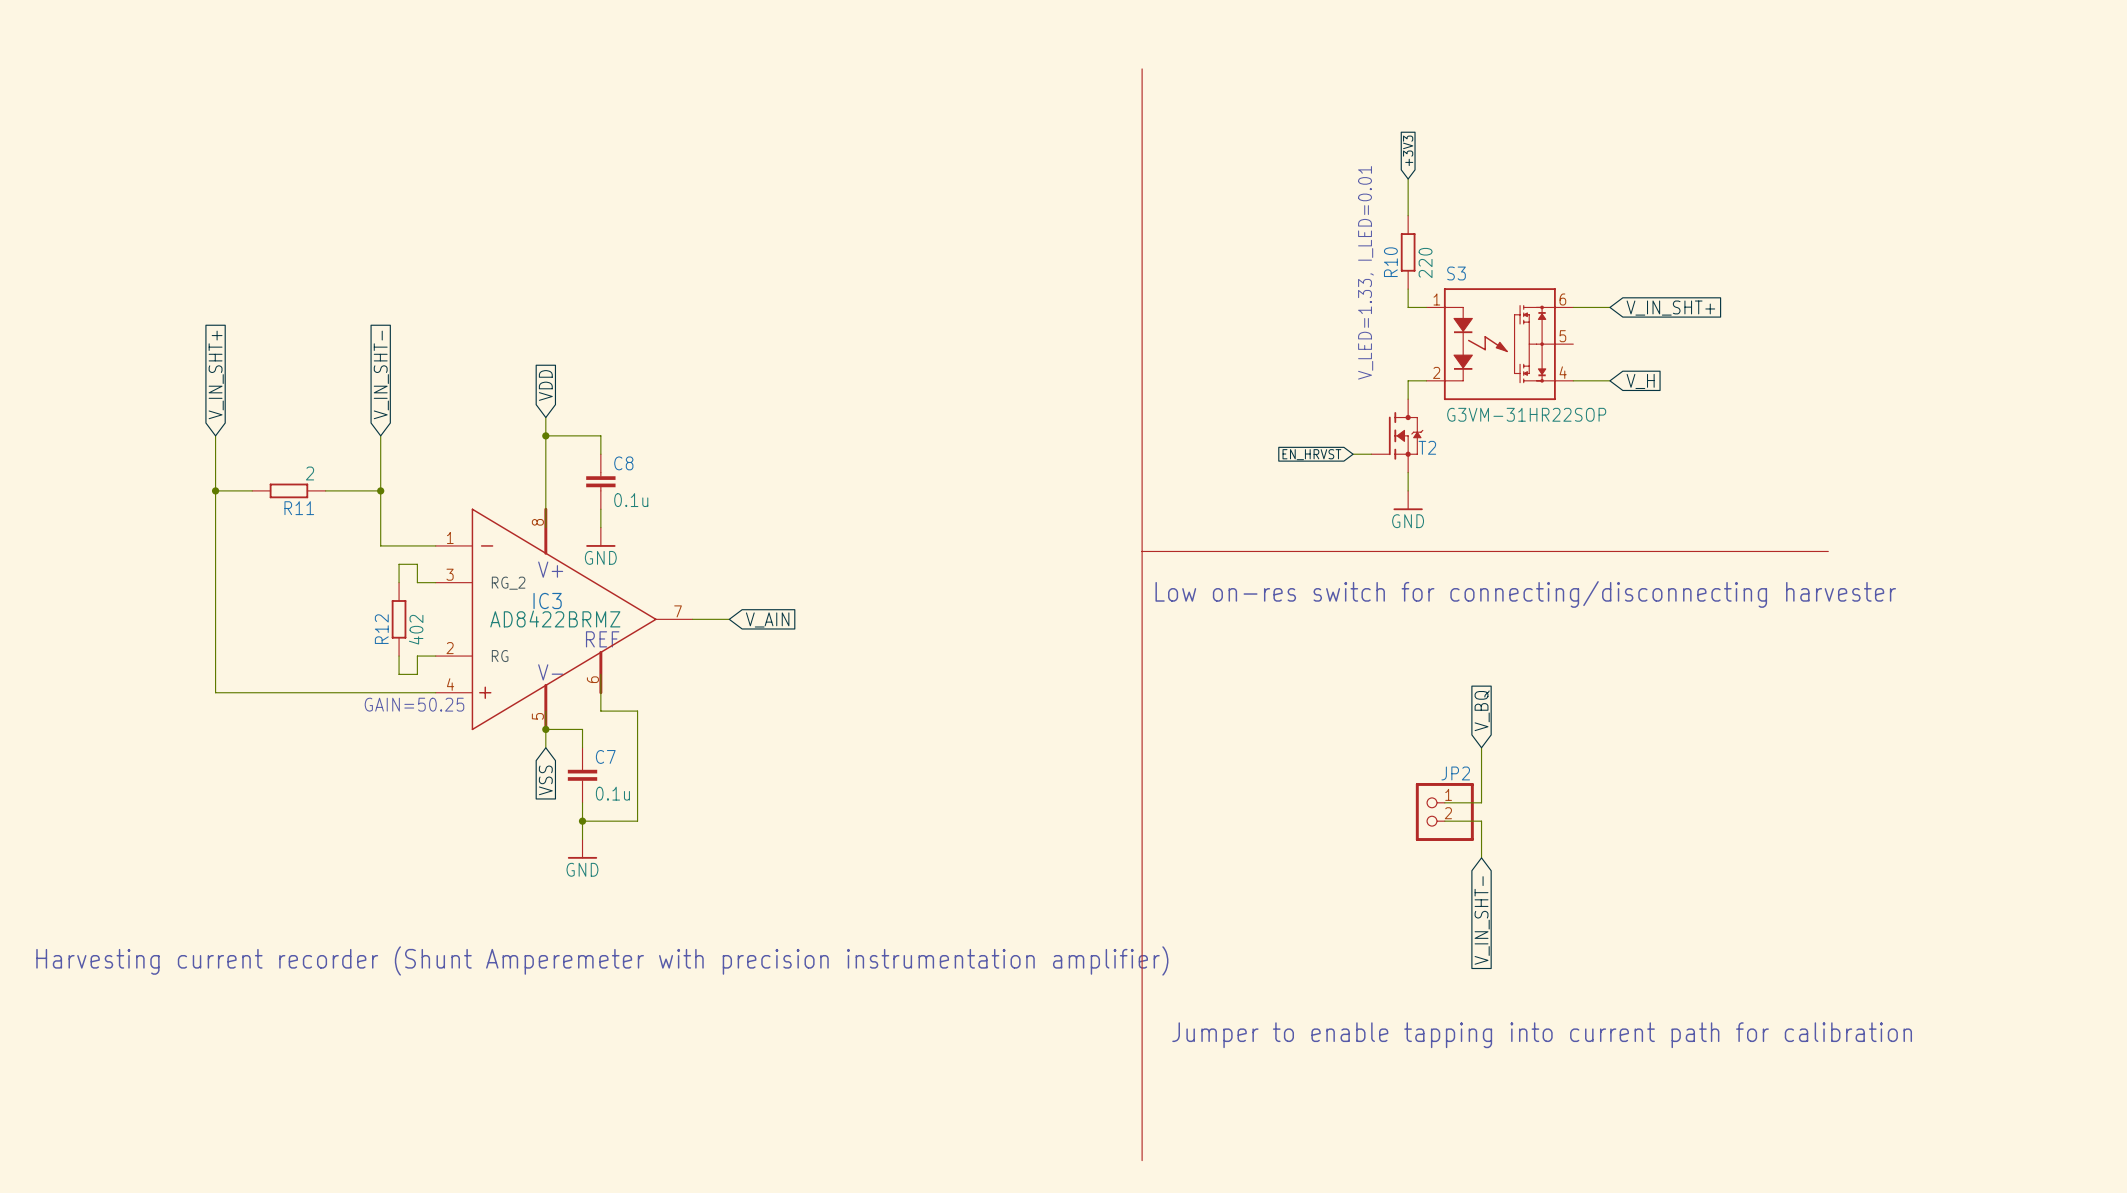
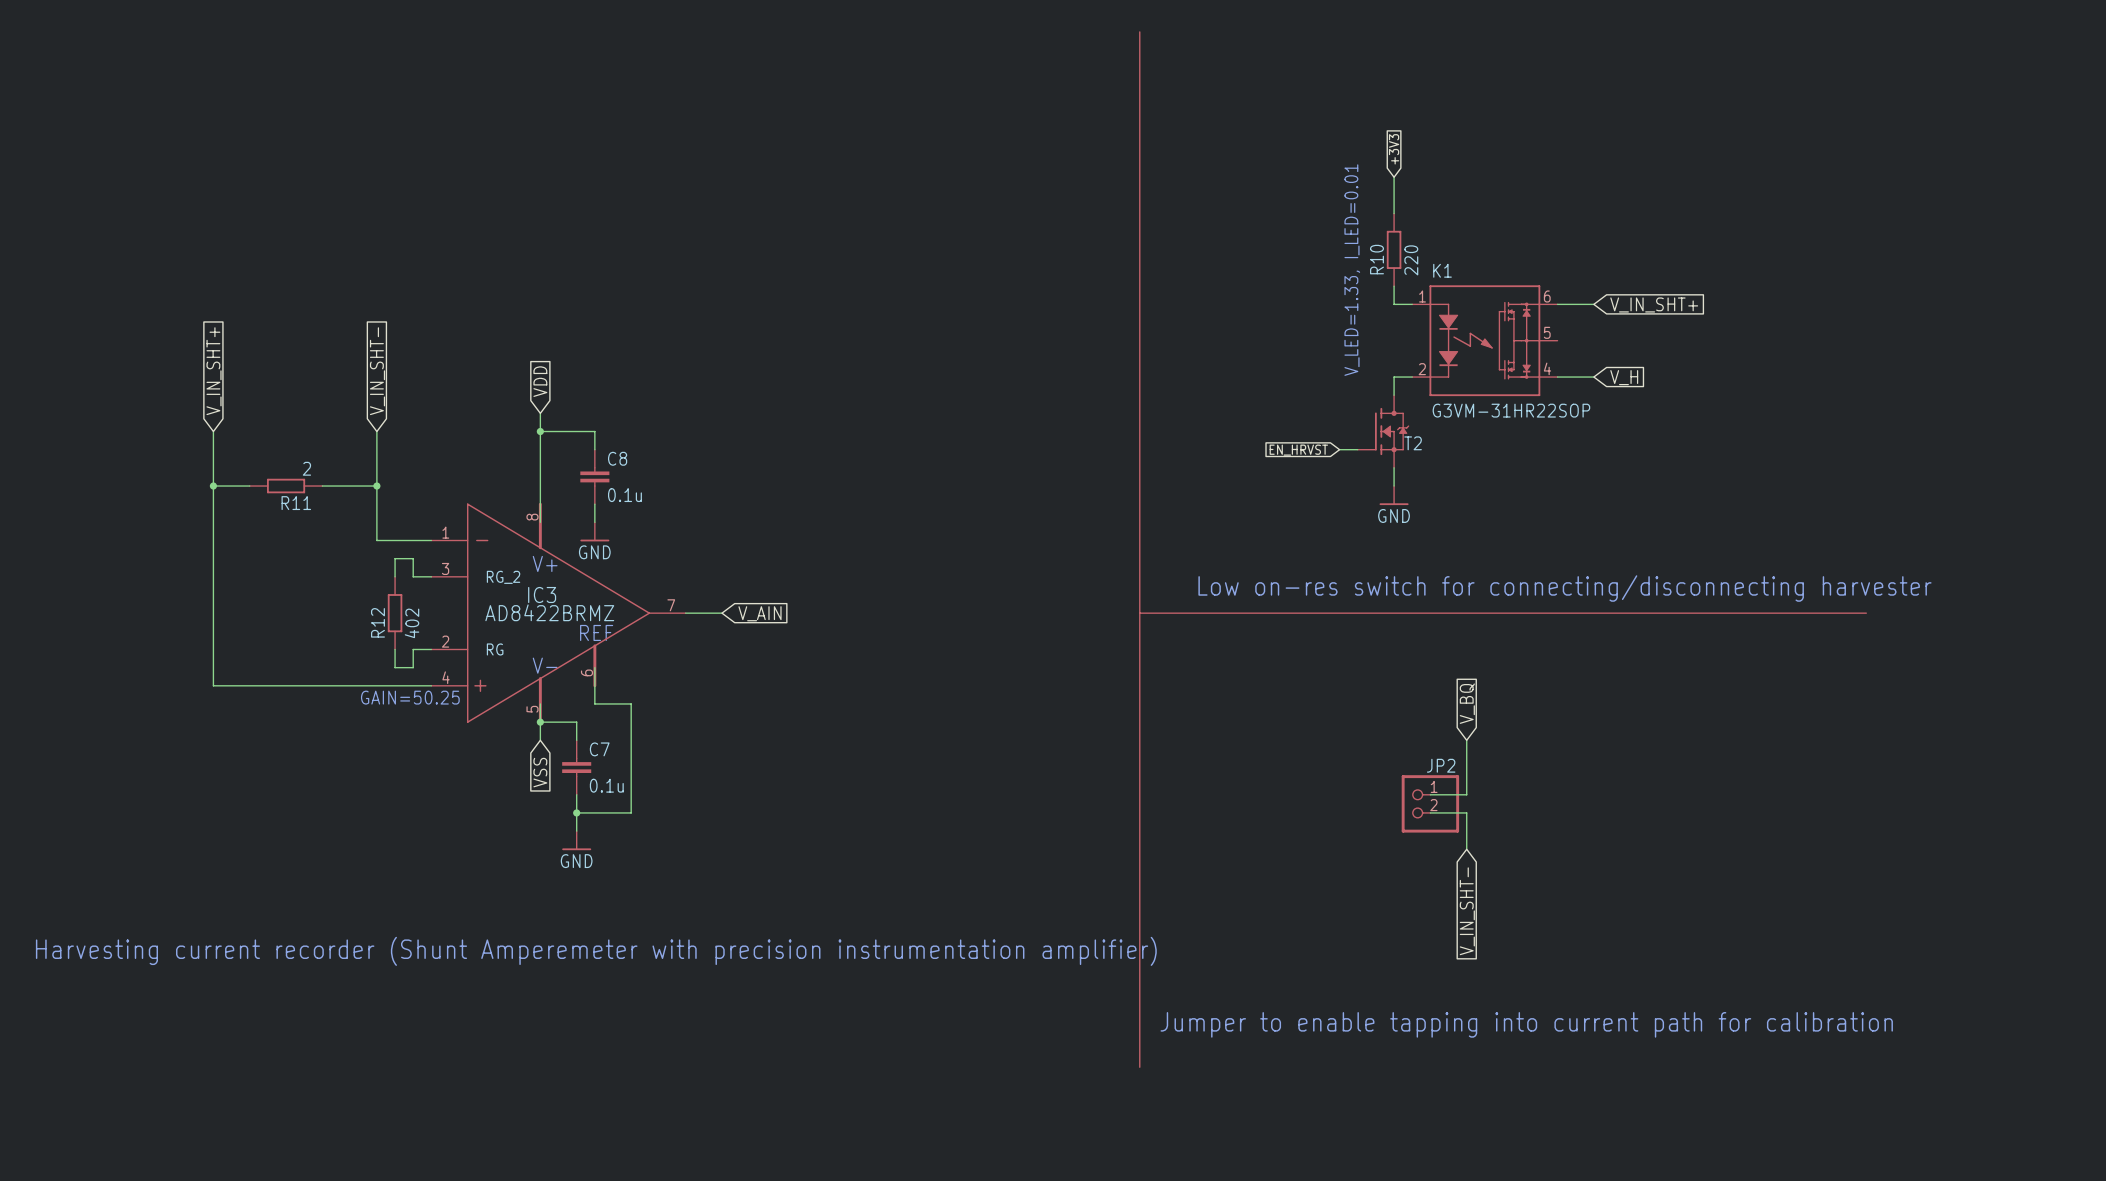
line: none -> (1139, 31) (1139, 1067)
line: (1142, 68) (1142, 1160) -> none
S3 name: S3 (1456, 273) -> K1 (1442, 270)
line: (1142, 551) (1828, 551) -> none
text position: Low on-res switch for connecting/disconnecting harvester (1525, 594) -> Low on-res switch for connecting/disconnecting harvester (1564, 588)
line: none -> (1139, 613) (1866, 613)

